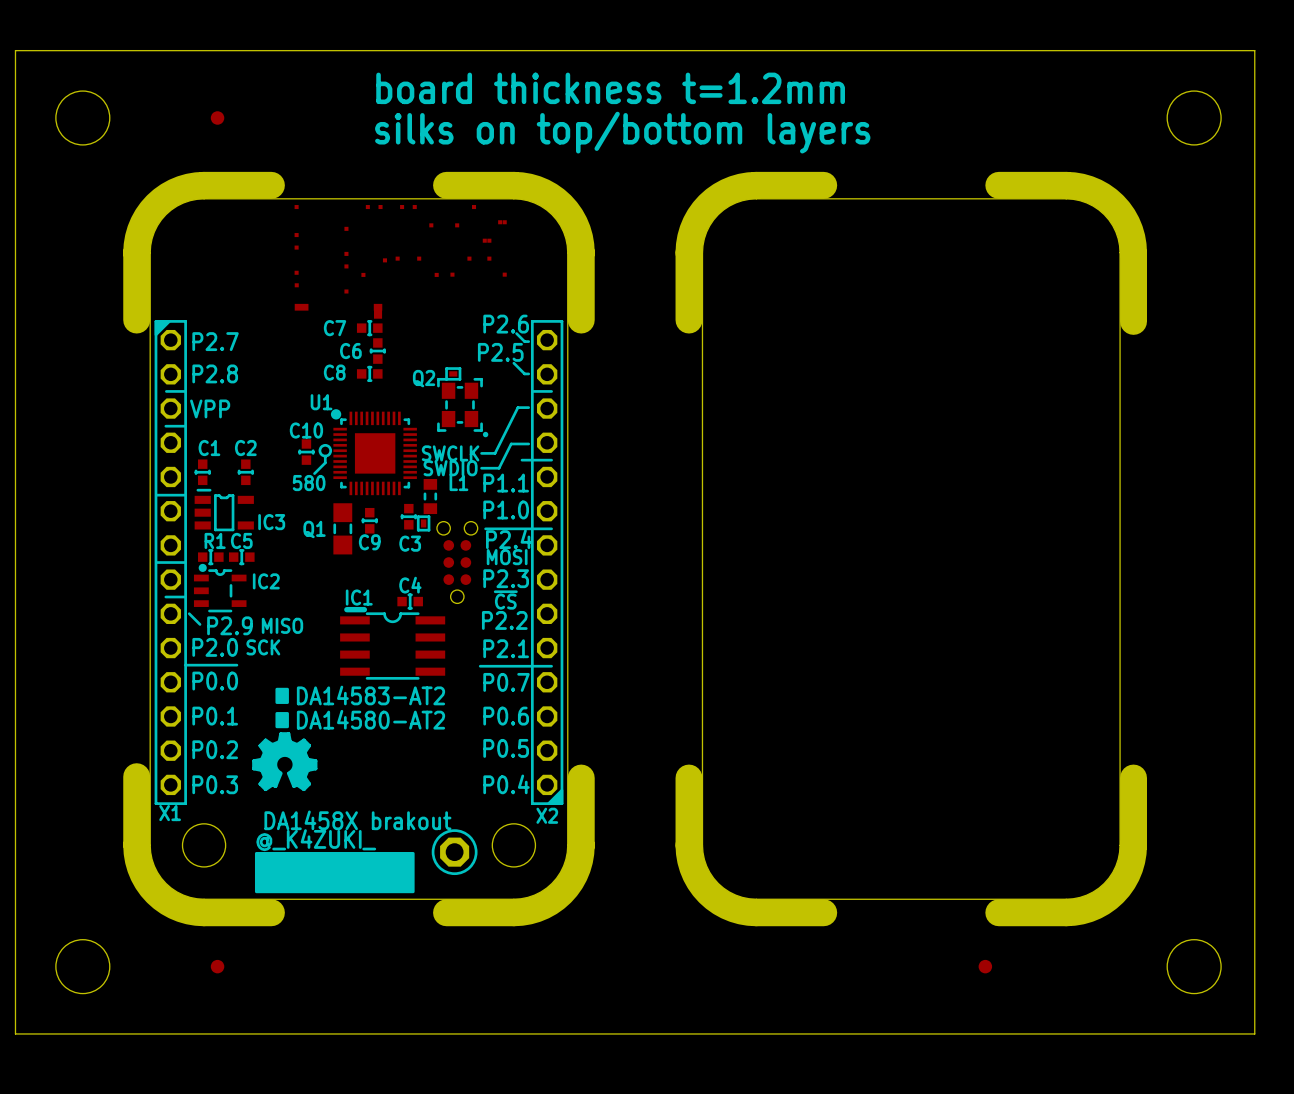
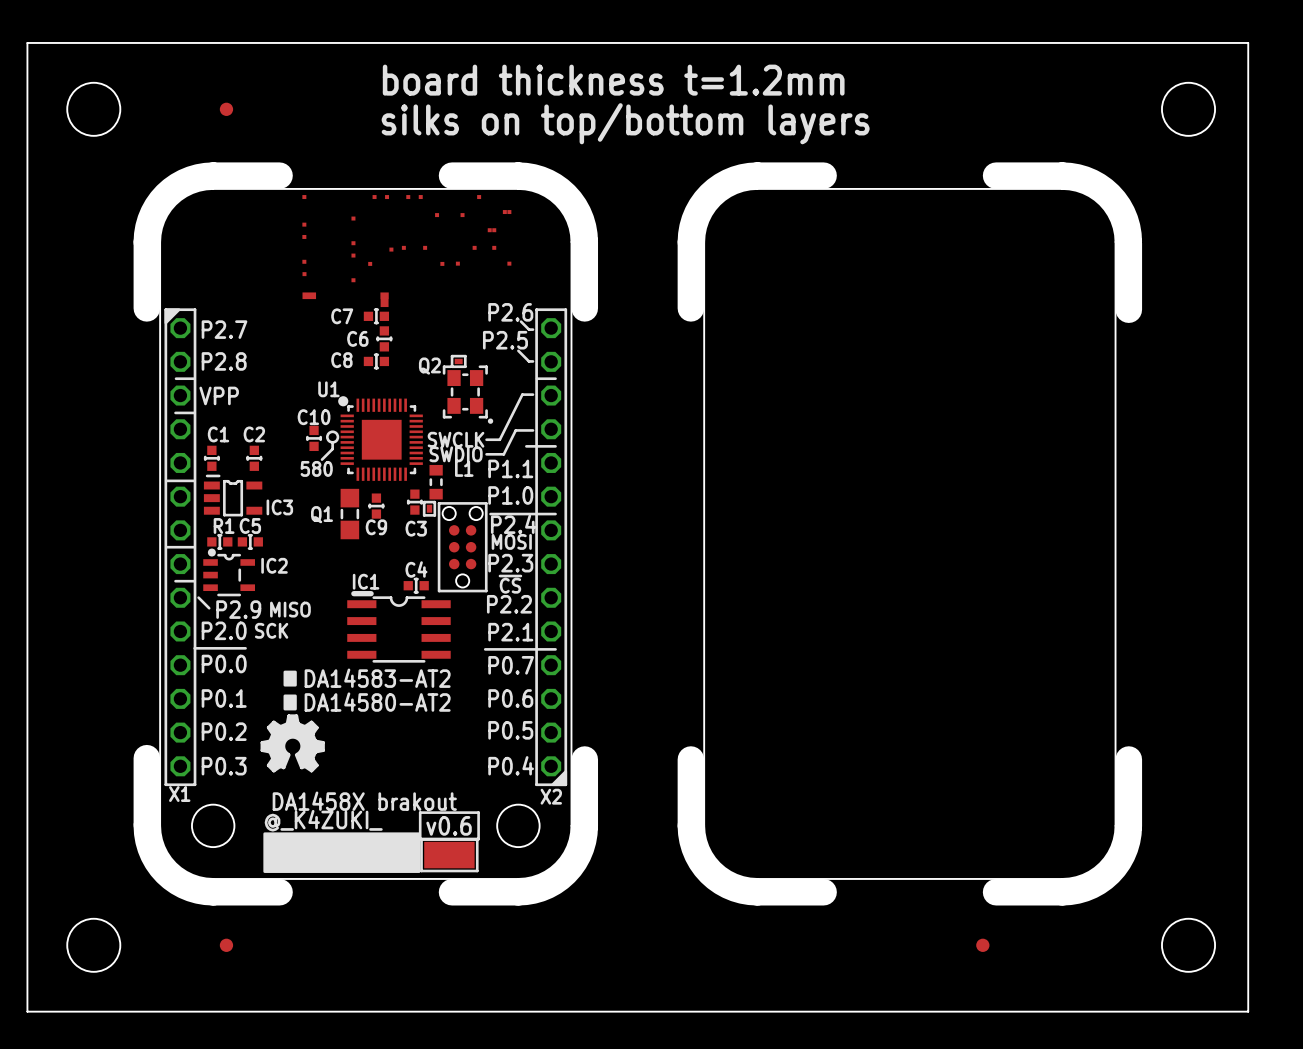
part footprint: [436, 521, 478, 604] -> [437, 502, 488, 593]
drawing shape: [431, 829, 478, 876] -> [418, 811, 480, 841]
part: (454, 852) -> none
part: none -> (449, 855)

